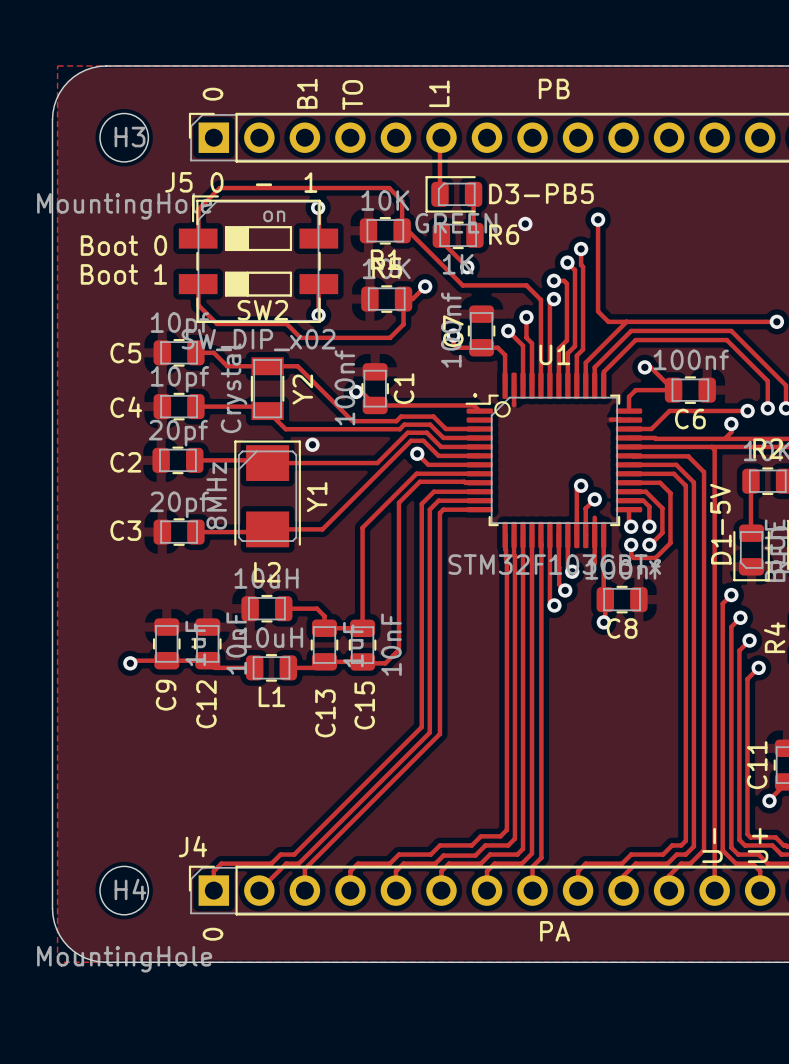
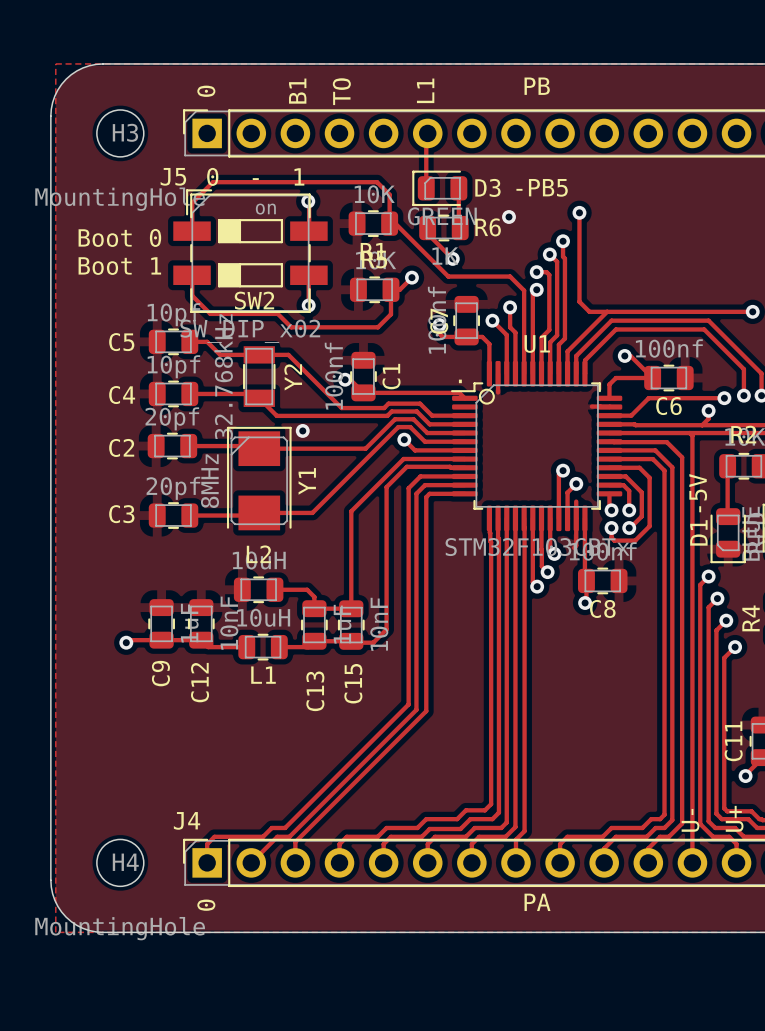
Y2 value: Crystal (234, 388) -> 32.768kHz (223, 376)

